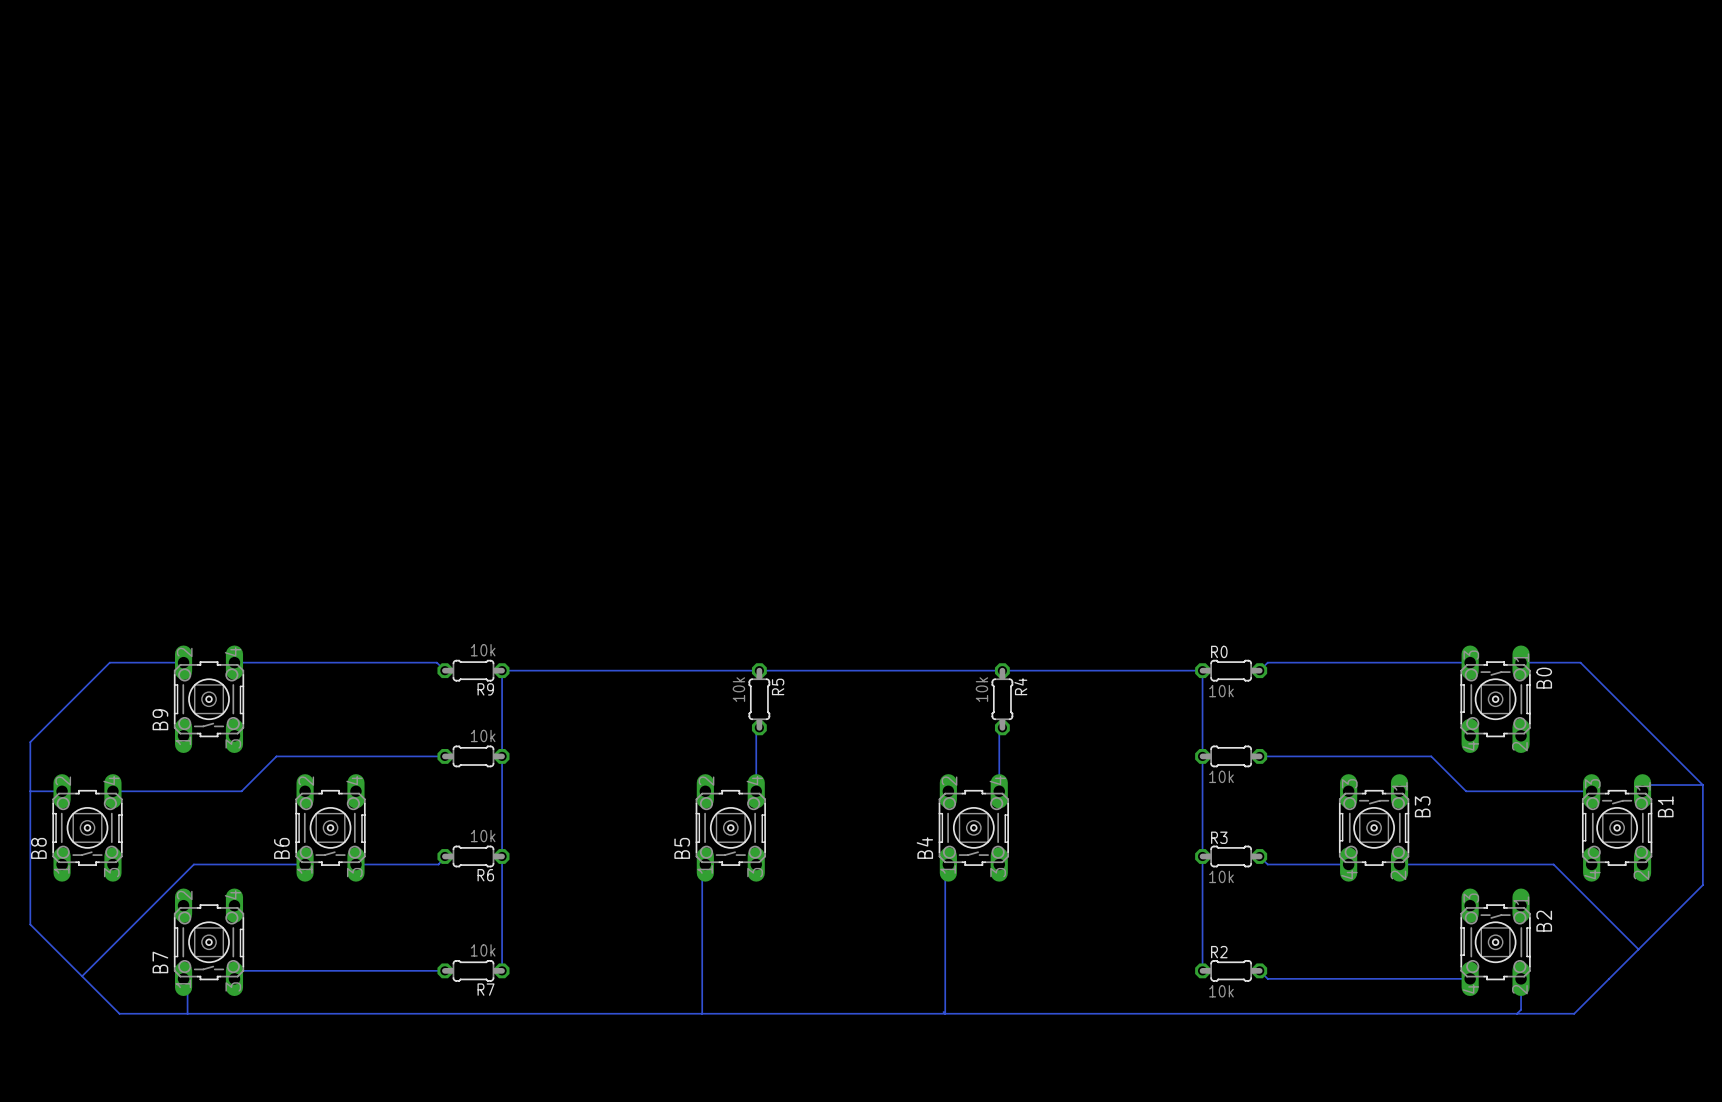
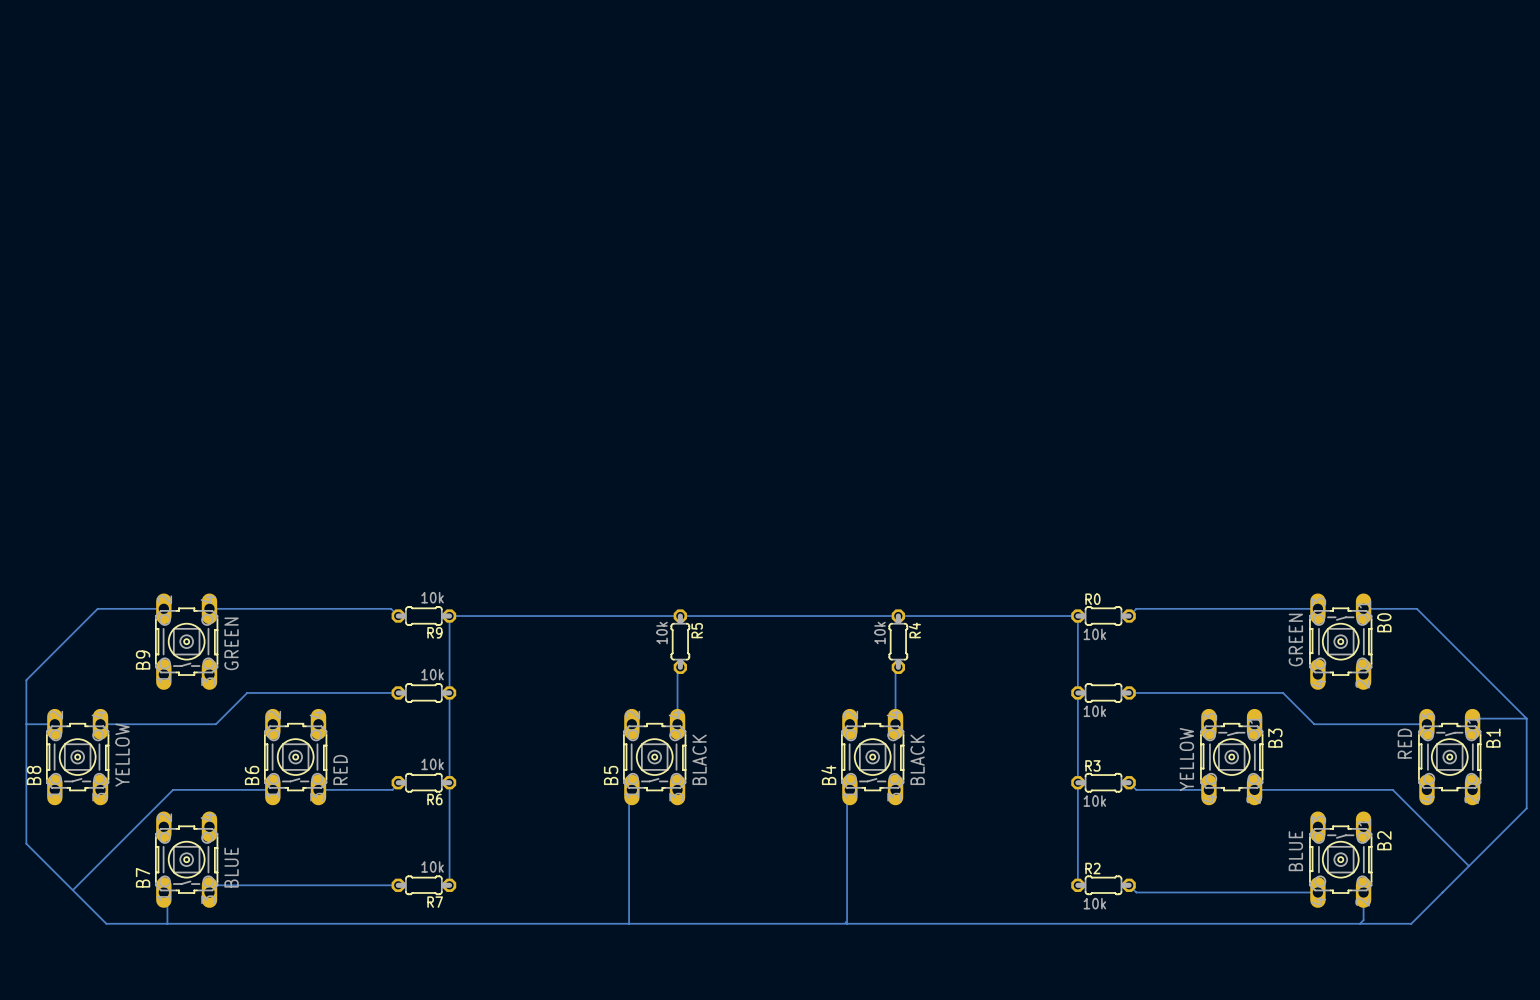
B0 value: none -> GREEN (1295, 640)
B9 value: none -> GREEN (231, 643)
B1 value: none -> RED (1404, 743)
B8 value: none -> YELLOW (122, 755)
B5 value: none -> BLACK (699, 759)
B4 value: none -> BLACK (917, 759)
B3 value: none -> YELLOW (1186, 759)
B6 value: none -> RED (340, 769)
B2 value: none -> BLUE (1295, 851)
B7 value: none -> BLUE (231, 867)

